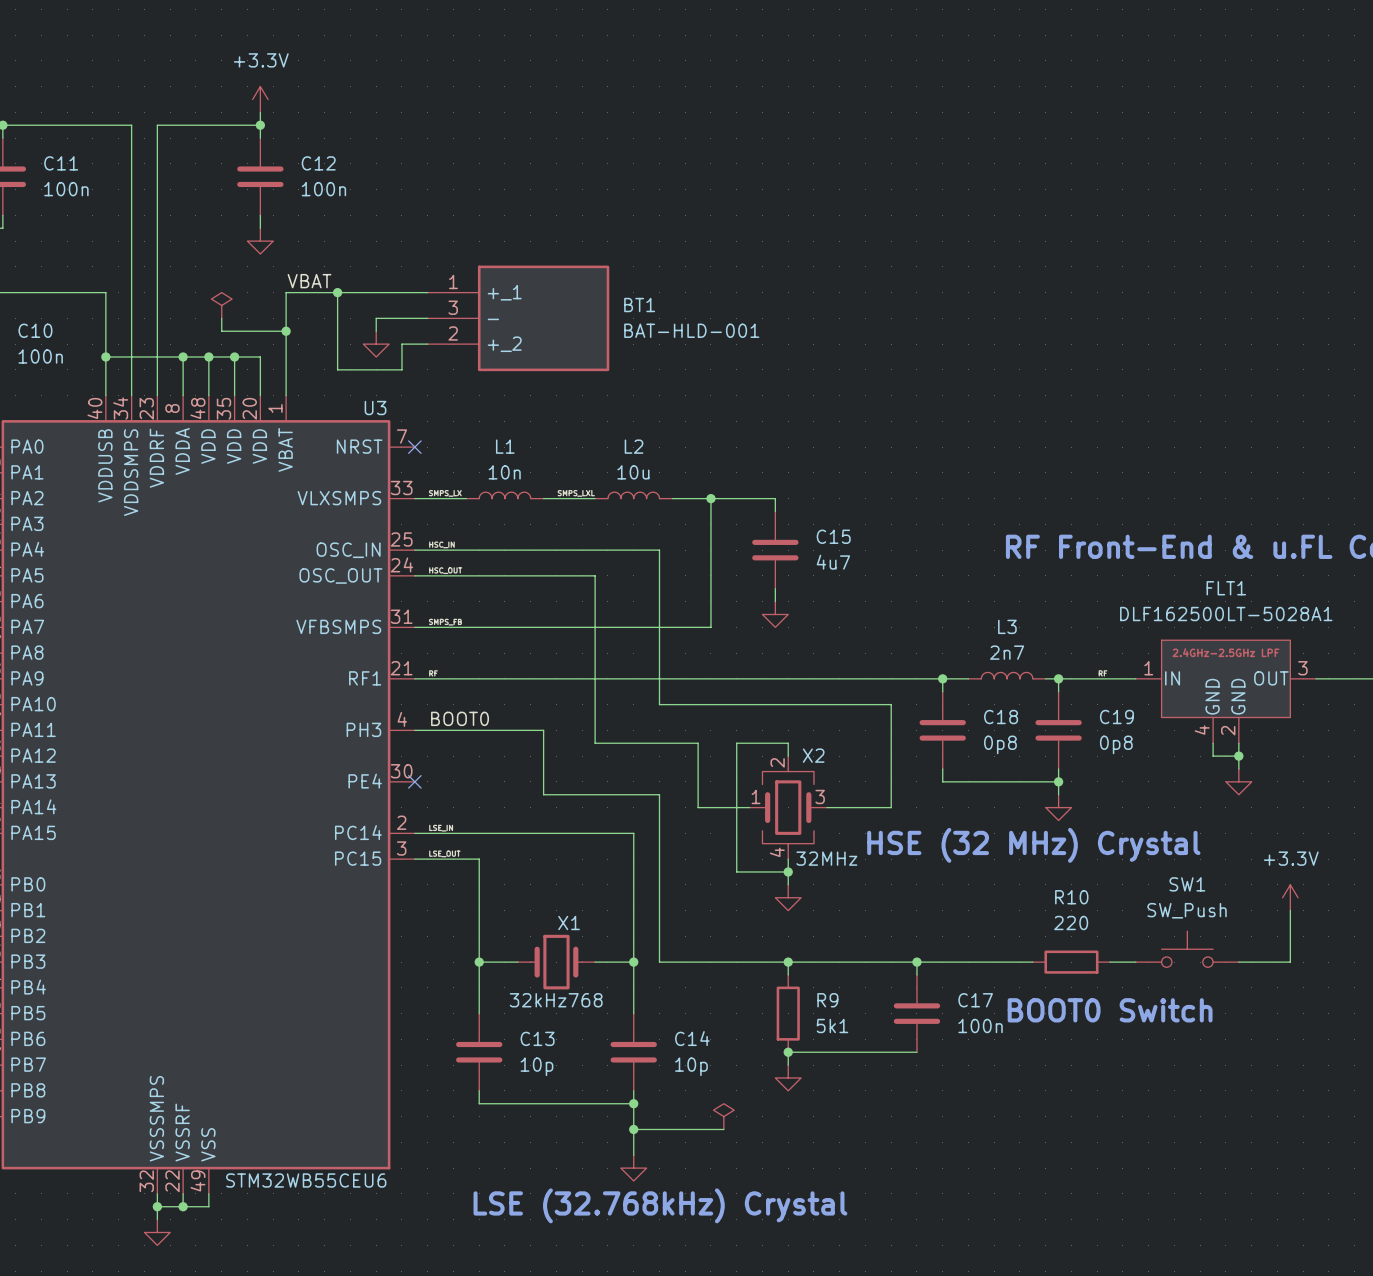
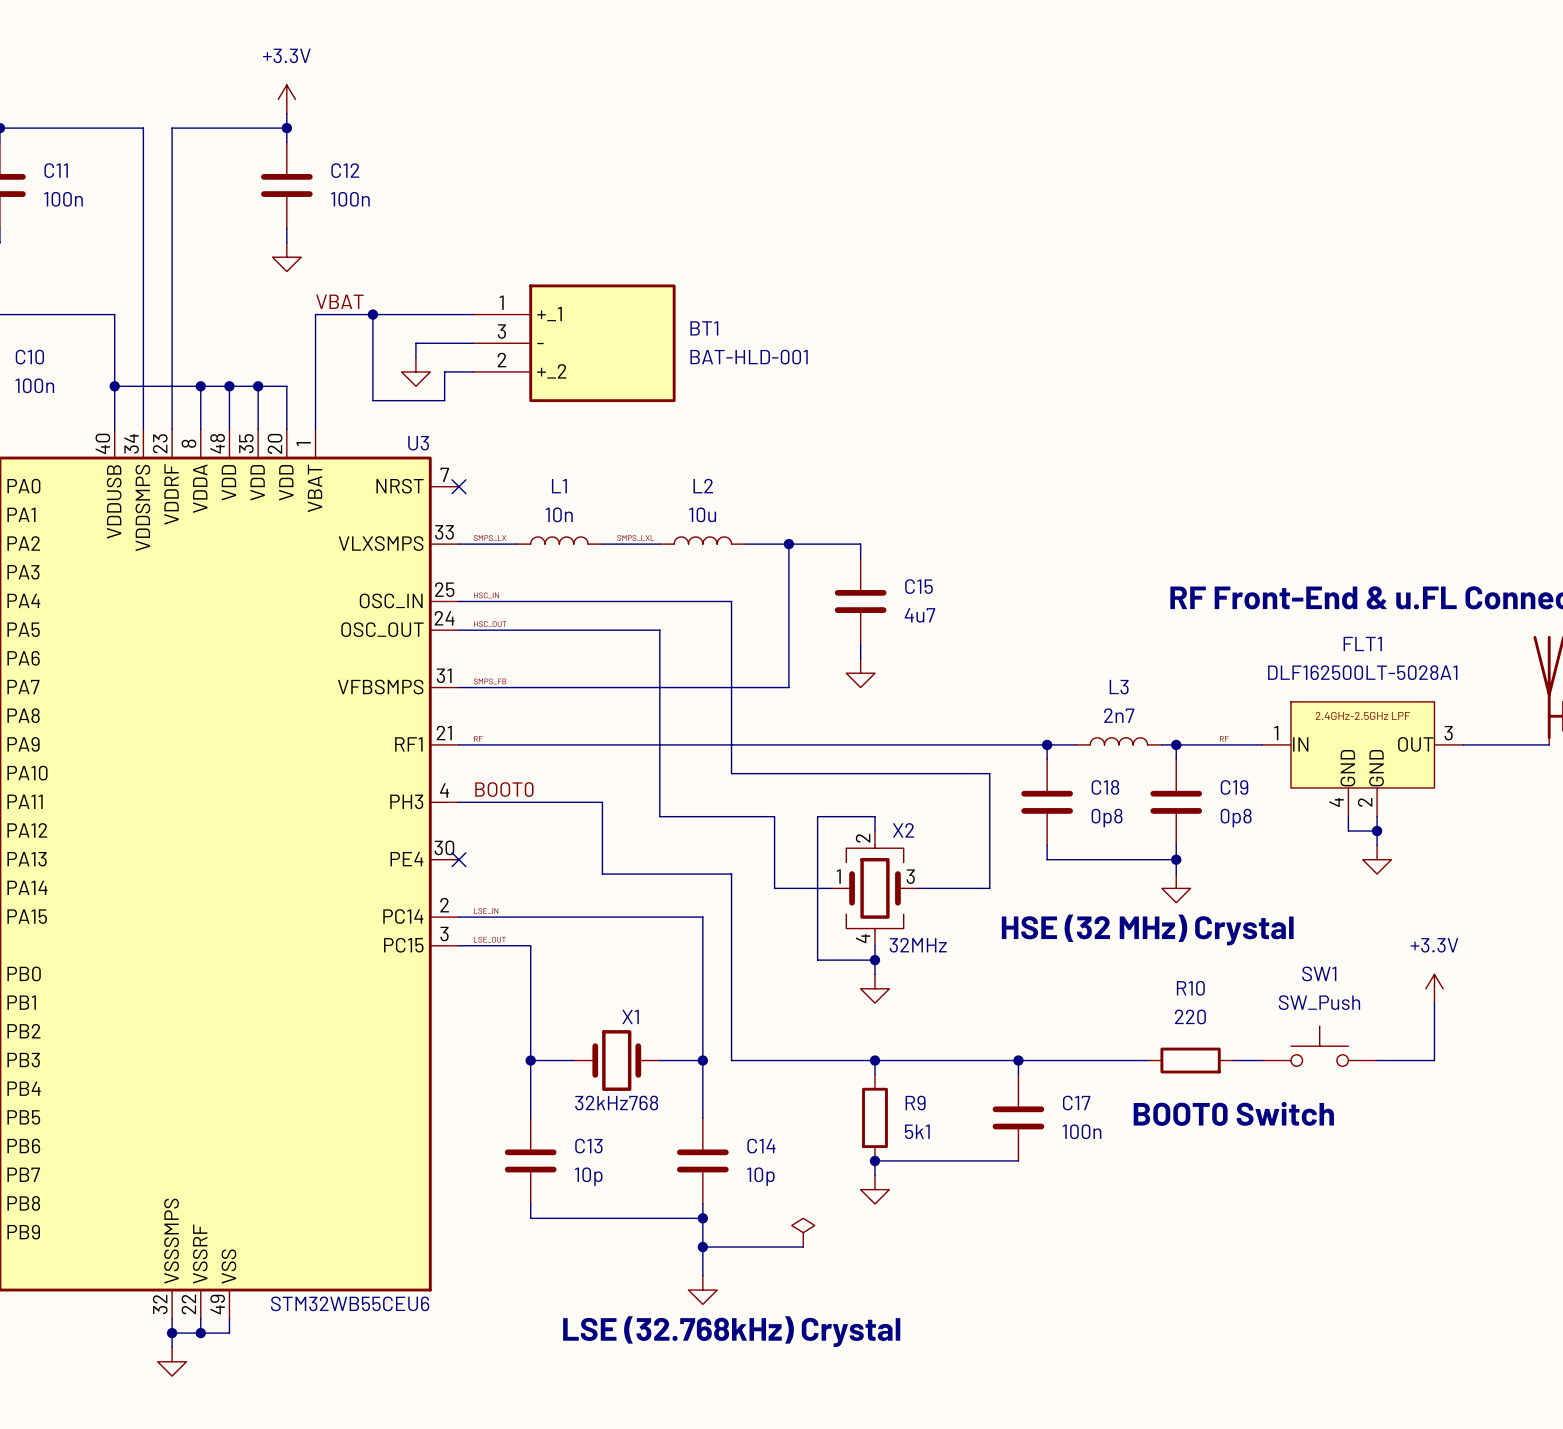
power symbol: (221, 305) -> none
wire: (221, 318) (221, 331) (286, 331) -> none
junction: (286, 331) -> none

